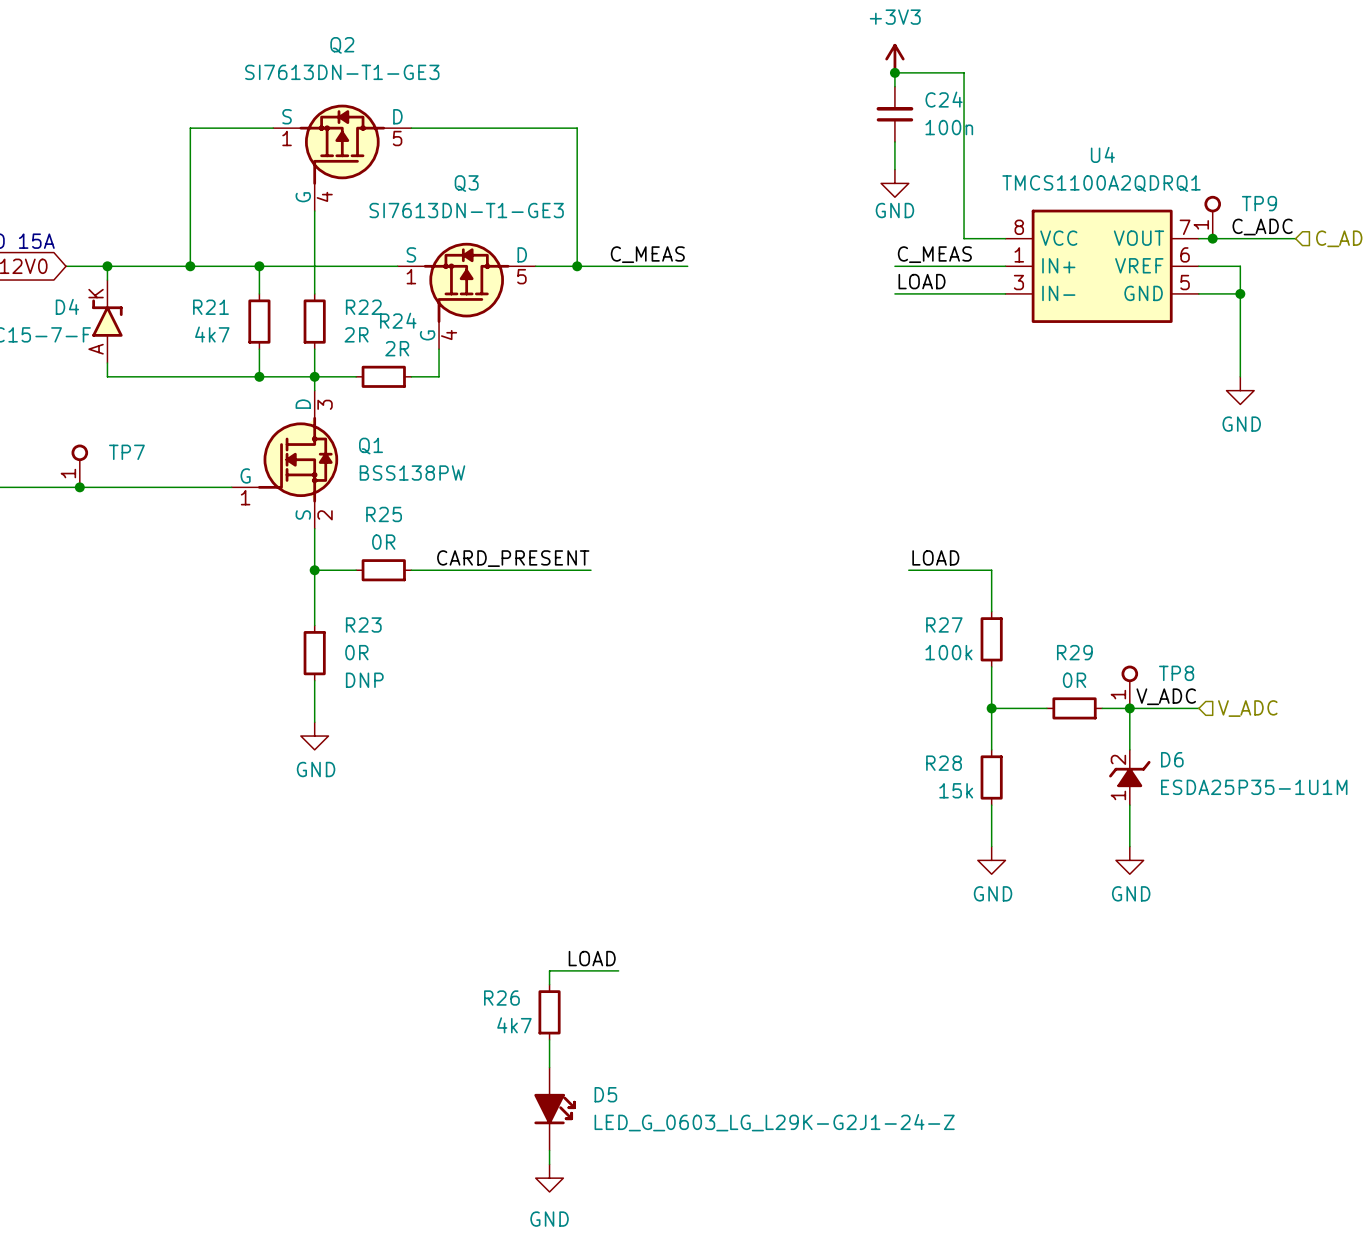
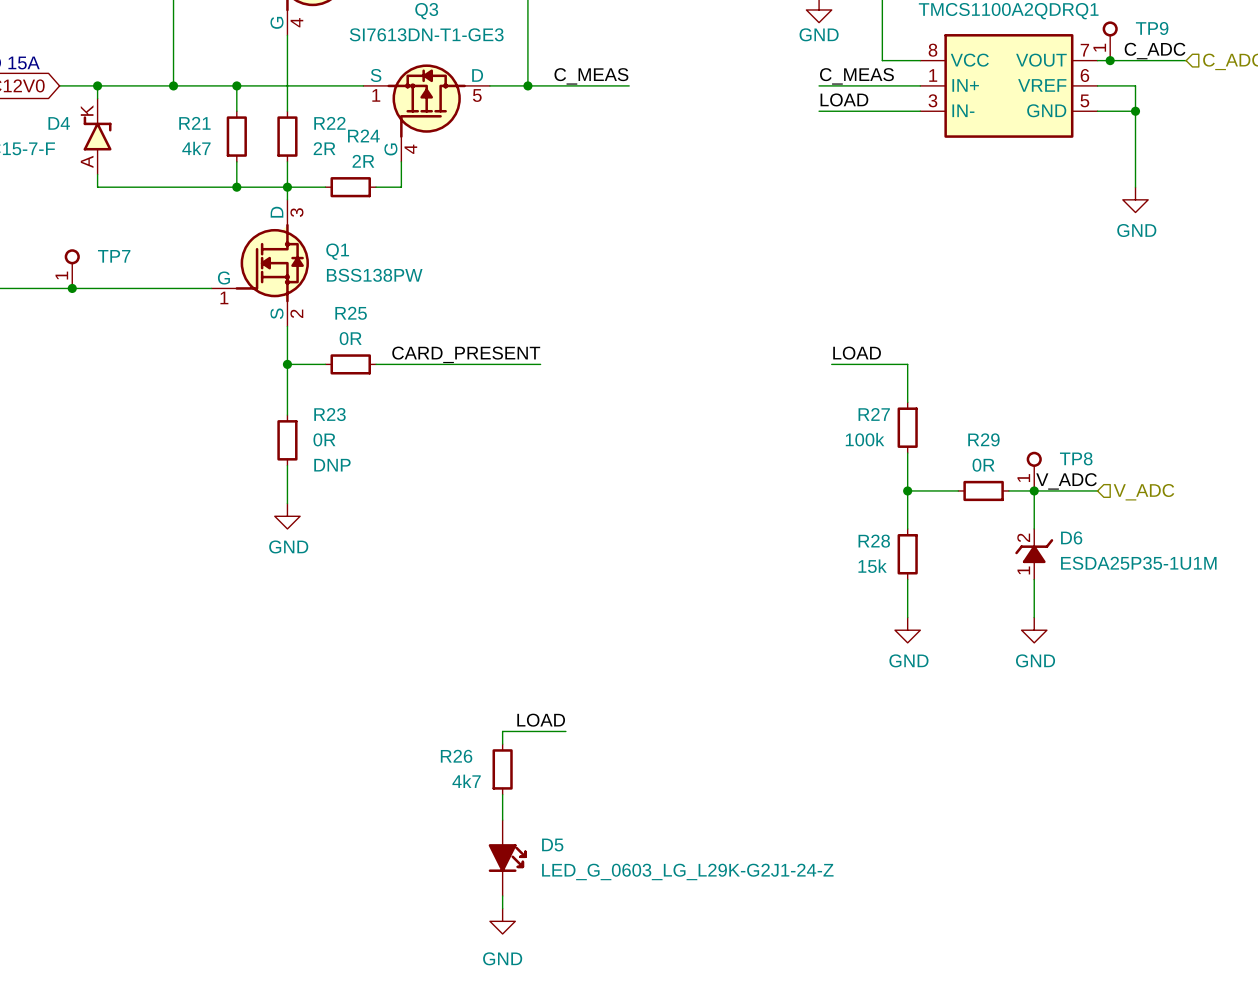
R27 name position: R27 (944, 624) -> R27 (874, 414)
R28 name position: R28 (944, 763) -> R28 (874, 541)

